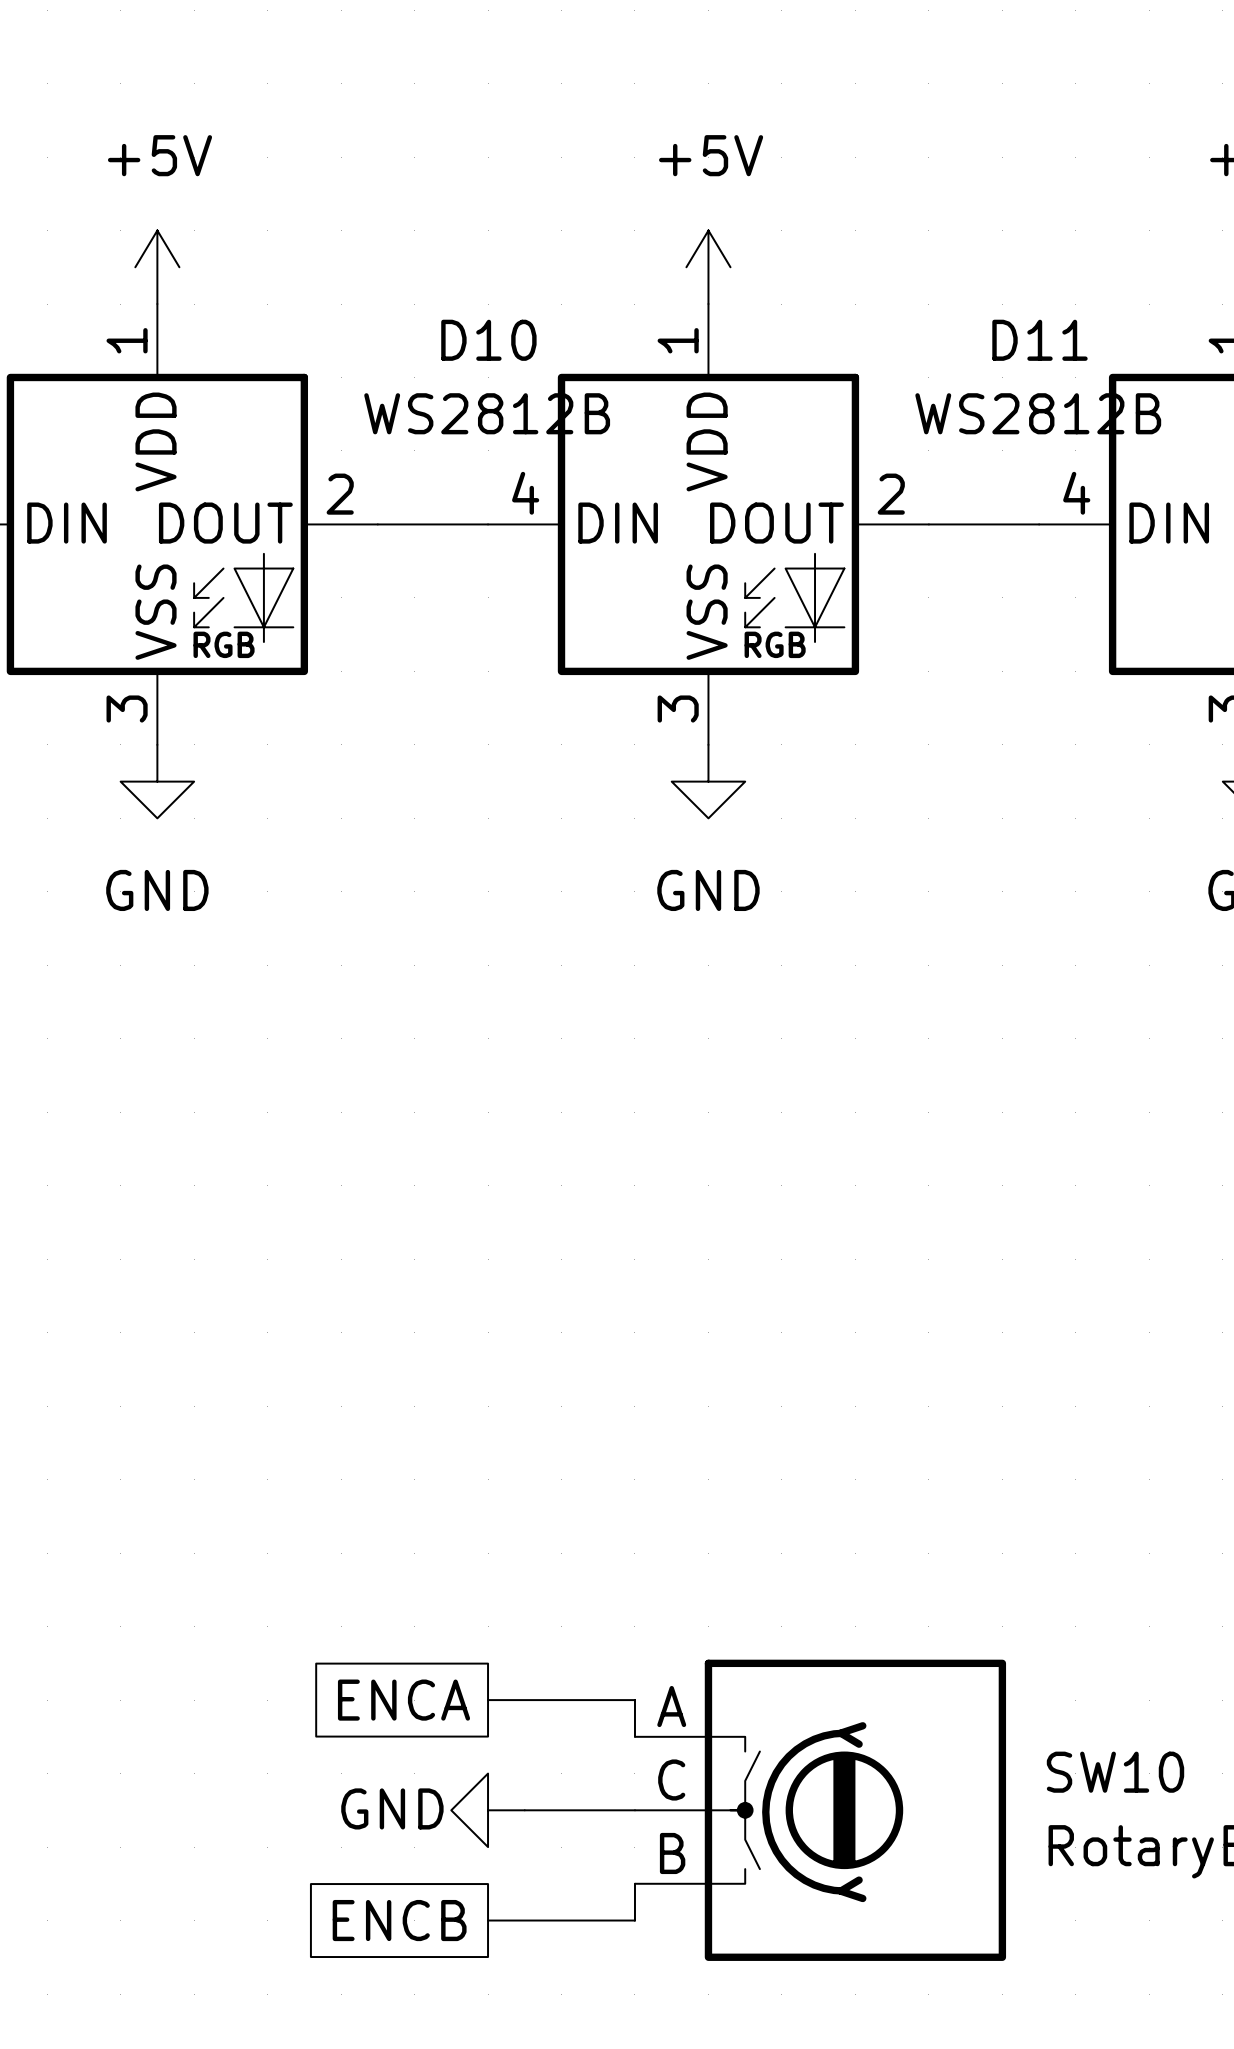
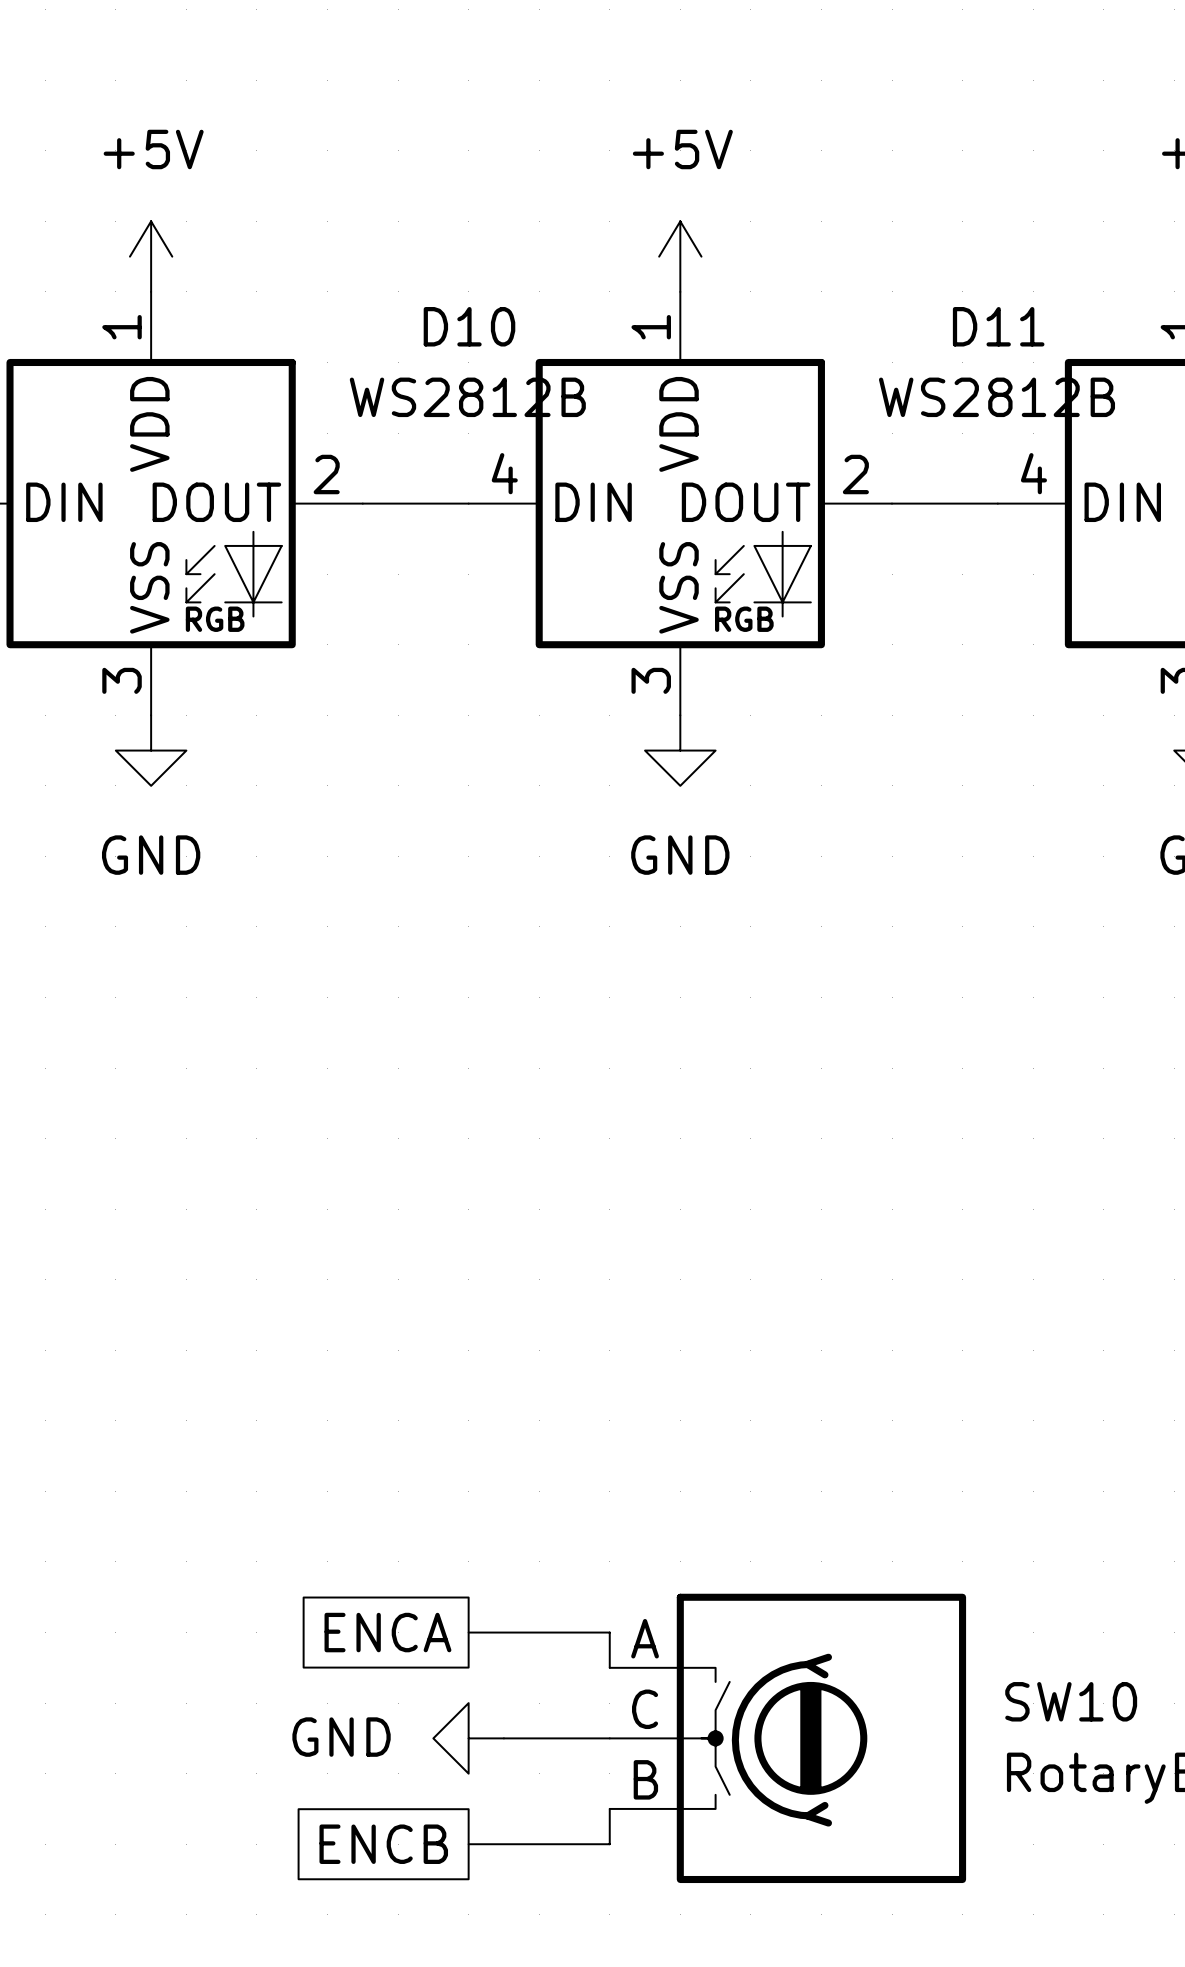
power symbol text position: GND (392, 1808) -> GND (341, 1737)

